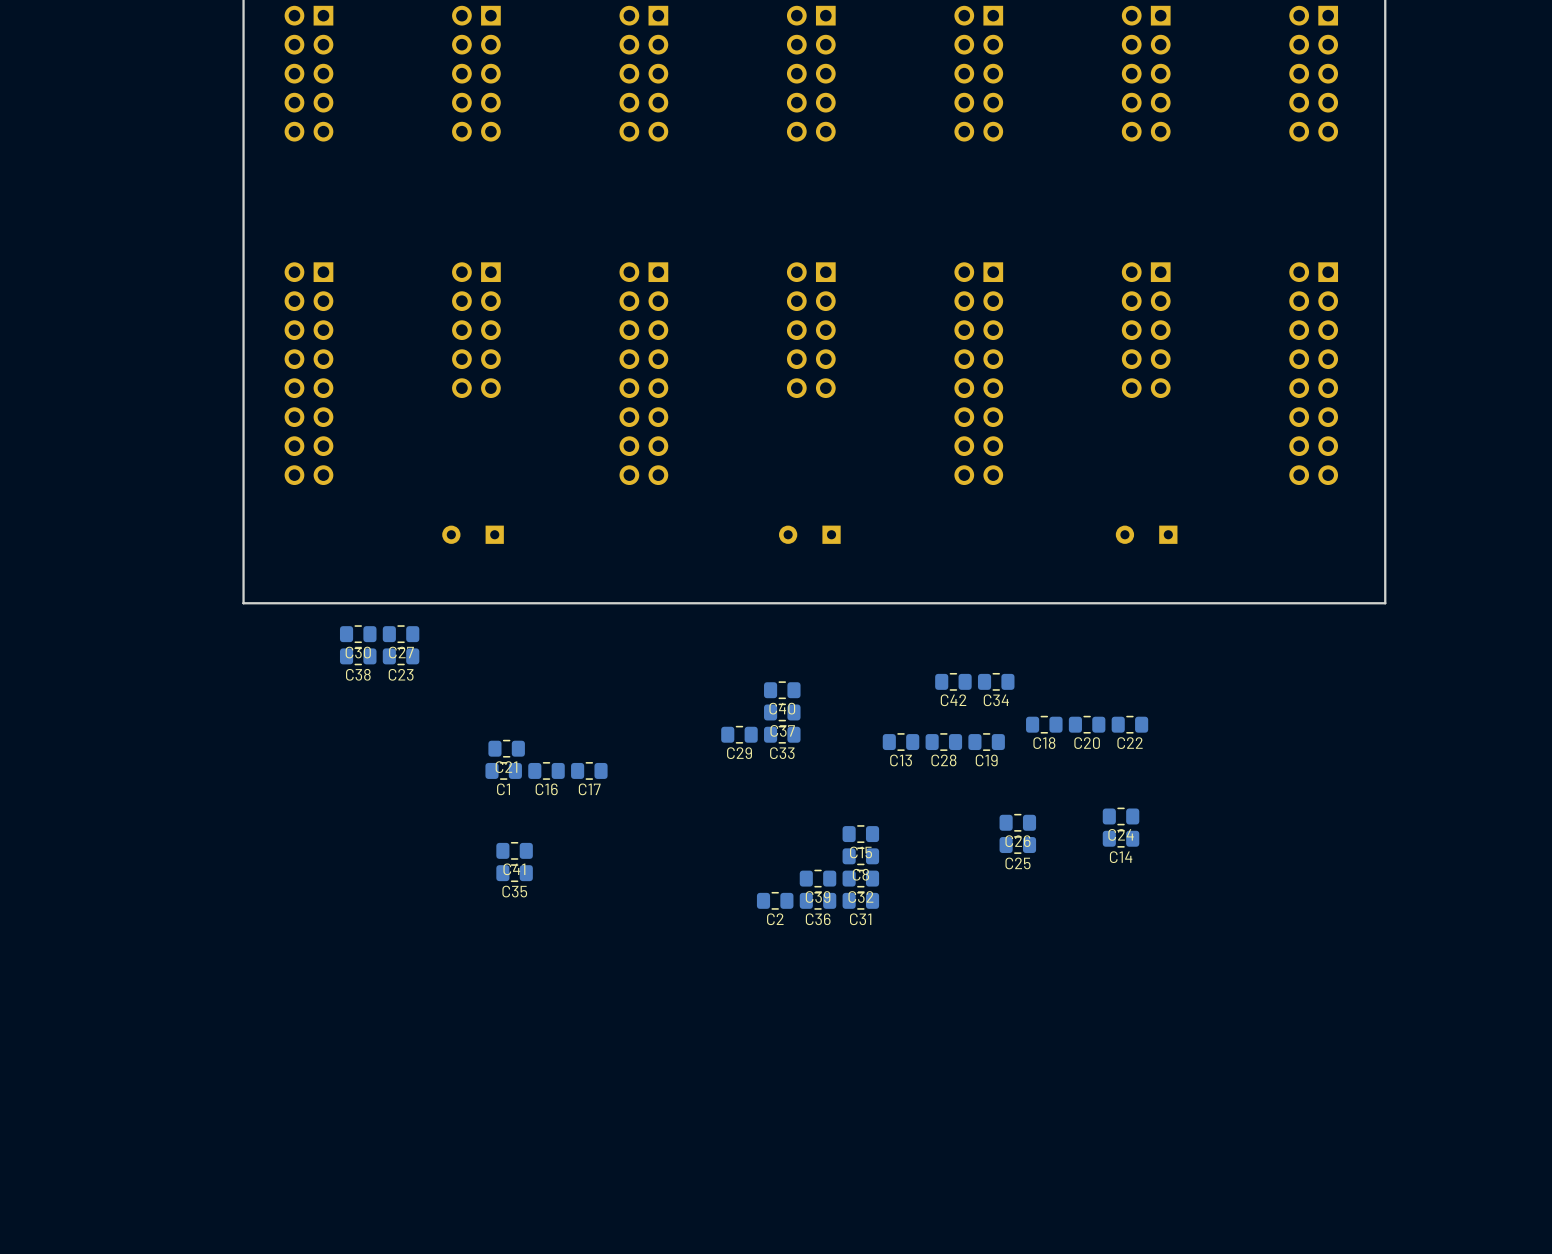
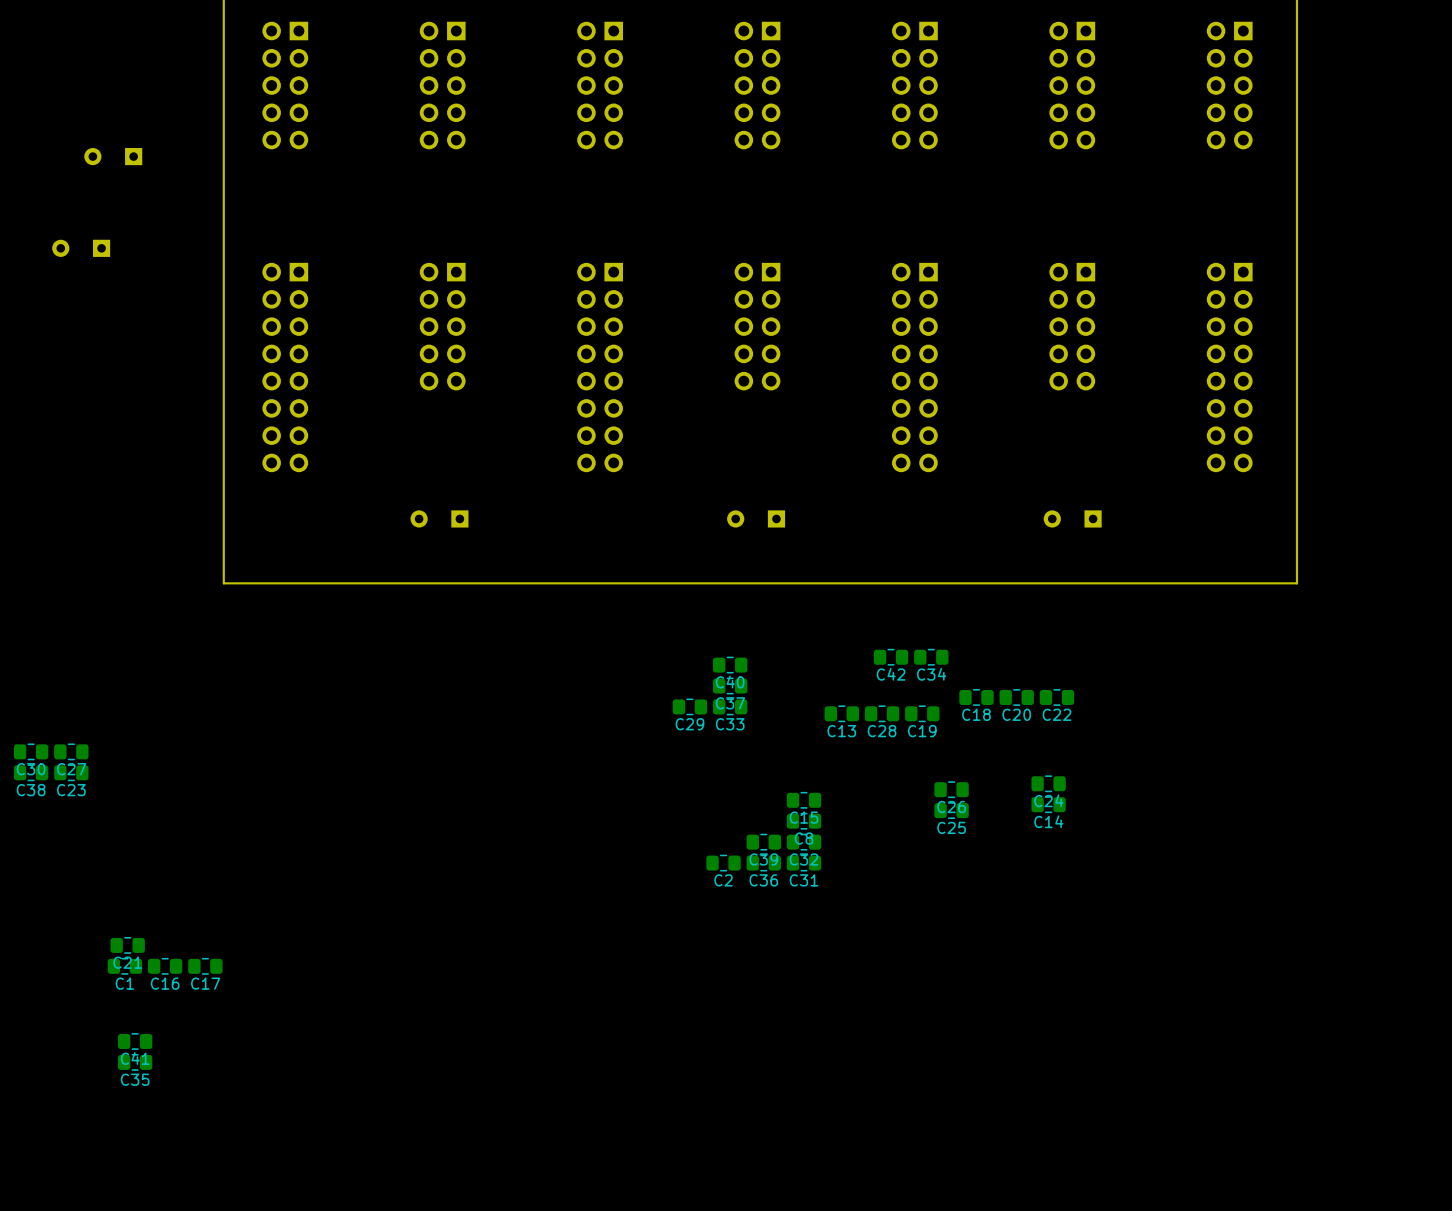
part: none -> (113, 156)
part: none -> (81, 248)
C30 position: (358, 634) -> (31, 751)
C27 position: (401, 634) -> (71, 751)
C38 position: (358, 656) -> (31, 772)
C23 position: (401, 656) -> (71, 772)
C21 position: (506, 748) -> (127, 945)
C1 position: (503, 770) -> (124, 966)
C16 position: (546, 770) -> (165, 966)
C17 position: (589, 770) -> (205, 966)
C41 position: (514, 850) -> (135, 1041)
C35 position: (514, 873) -> (135, 1062)

